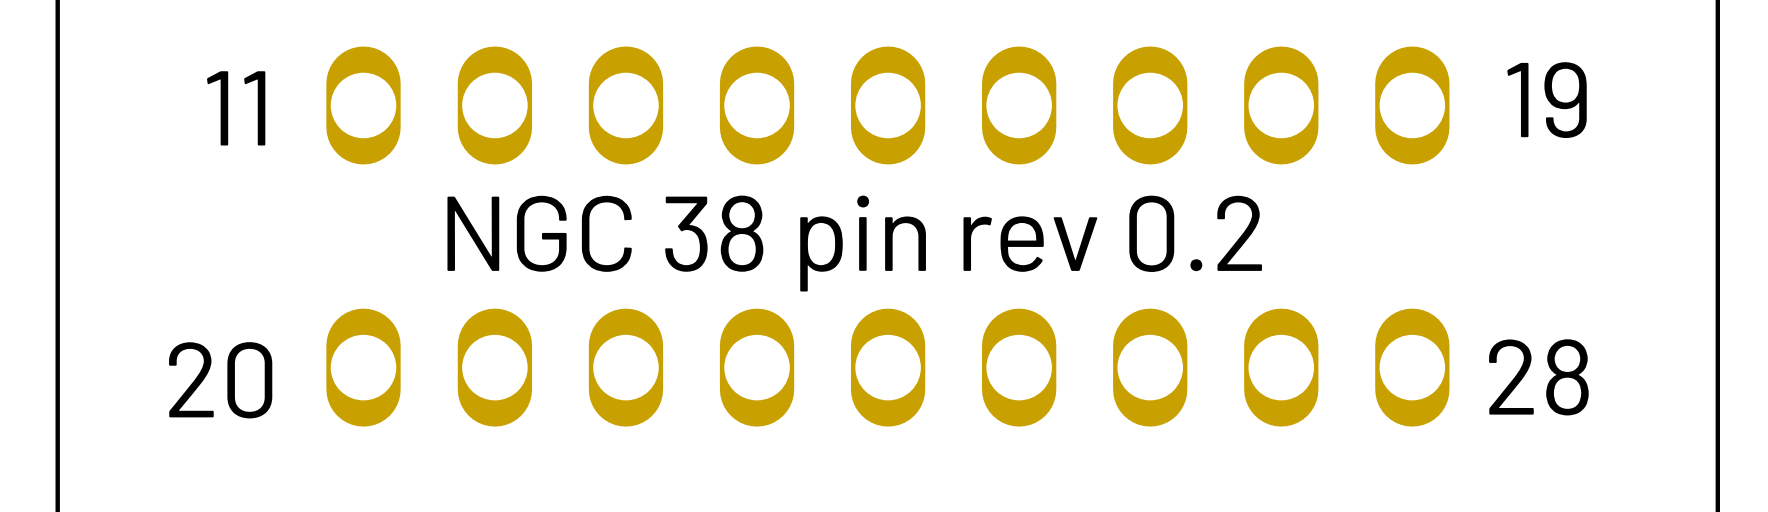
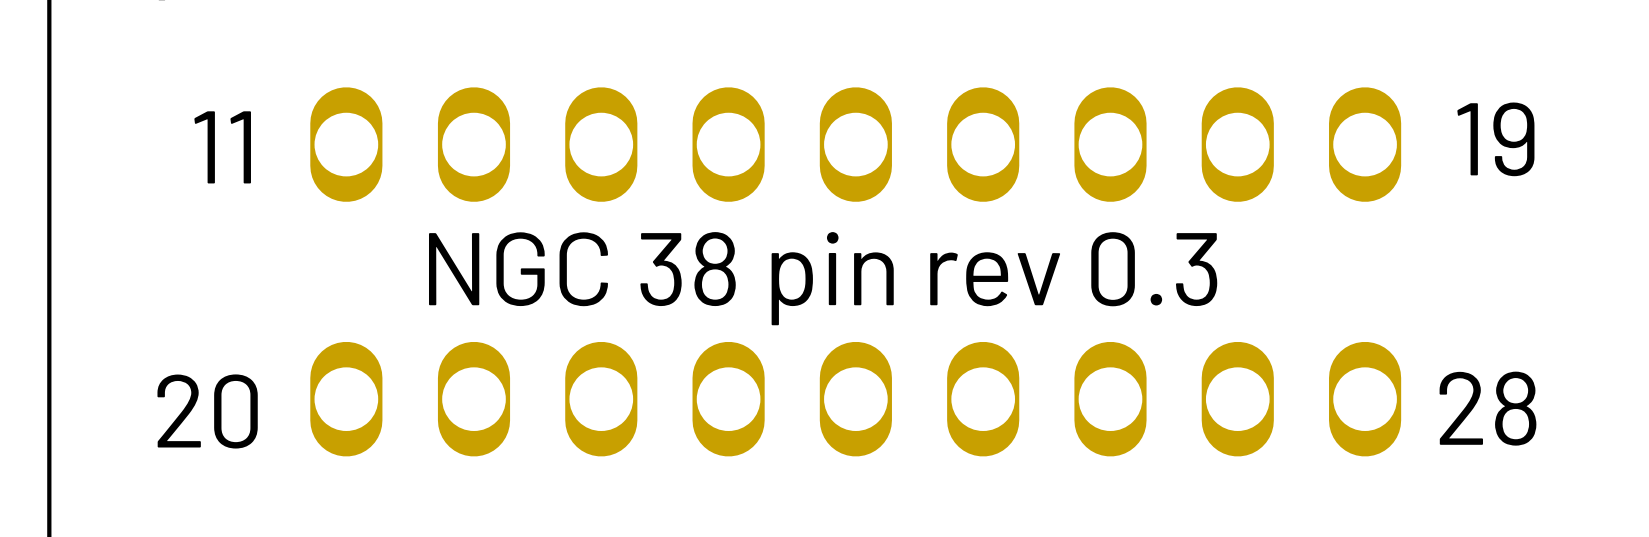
text: NGC 38 pin rev 0.2 (854, 243) -> NGC 38 pin rev 0.3 (823, 278)

